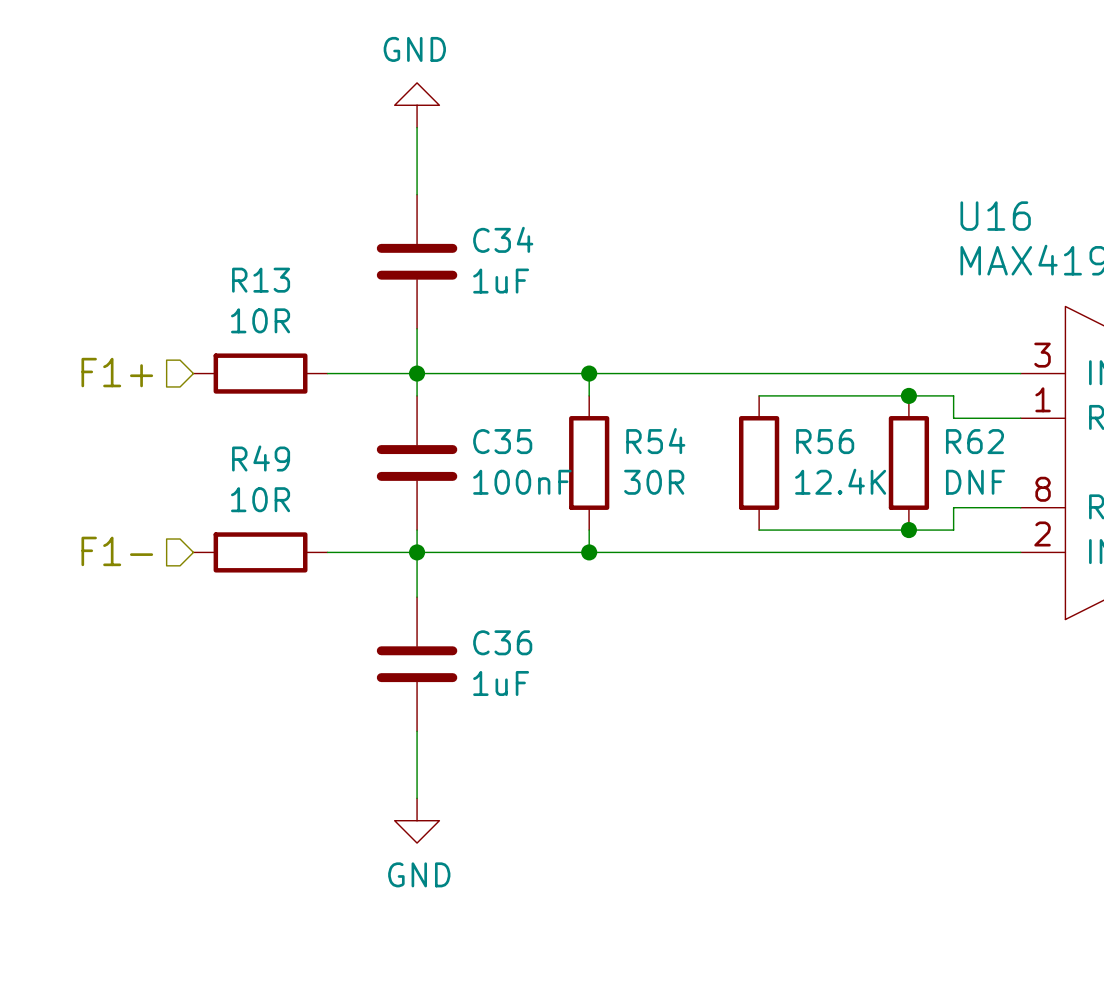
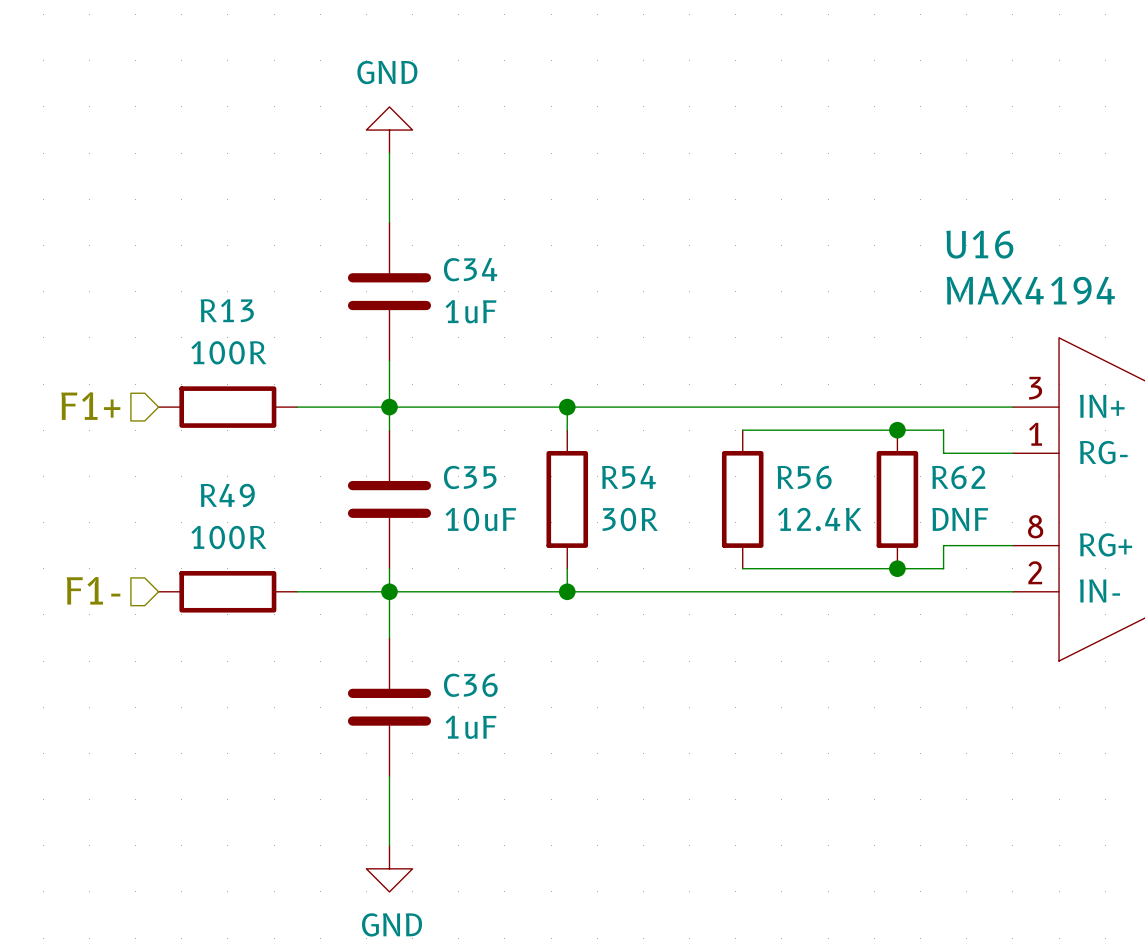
R13 value: 10R (260, 320) -> 100R (228, 352)
C35 value: 100nF (522, 482) -> 10uF (480, 519)
R49 value: 10R (260, 499) -> 100R (228, 537)

